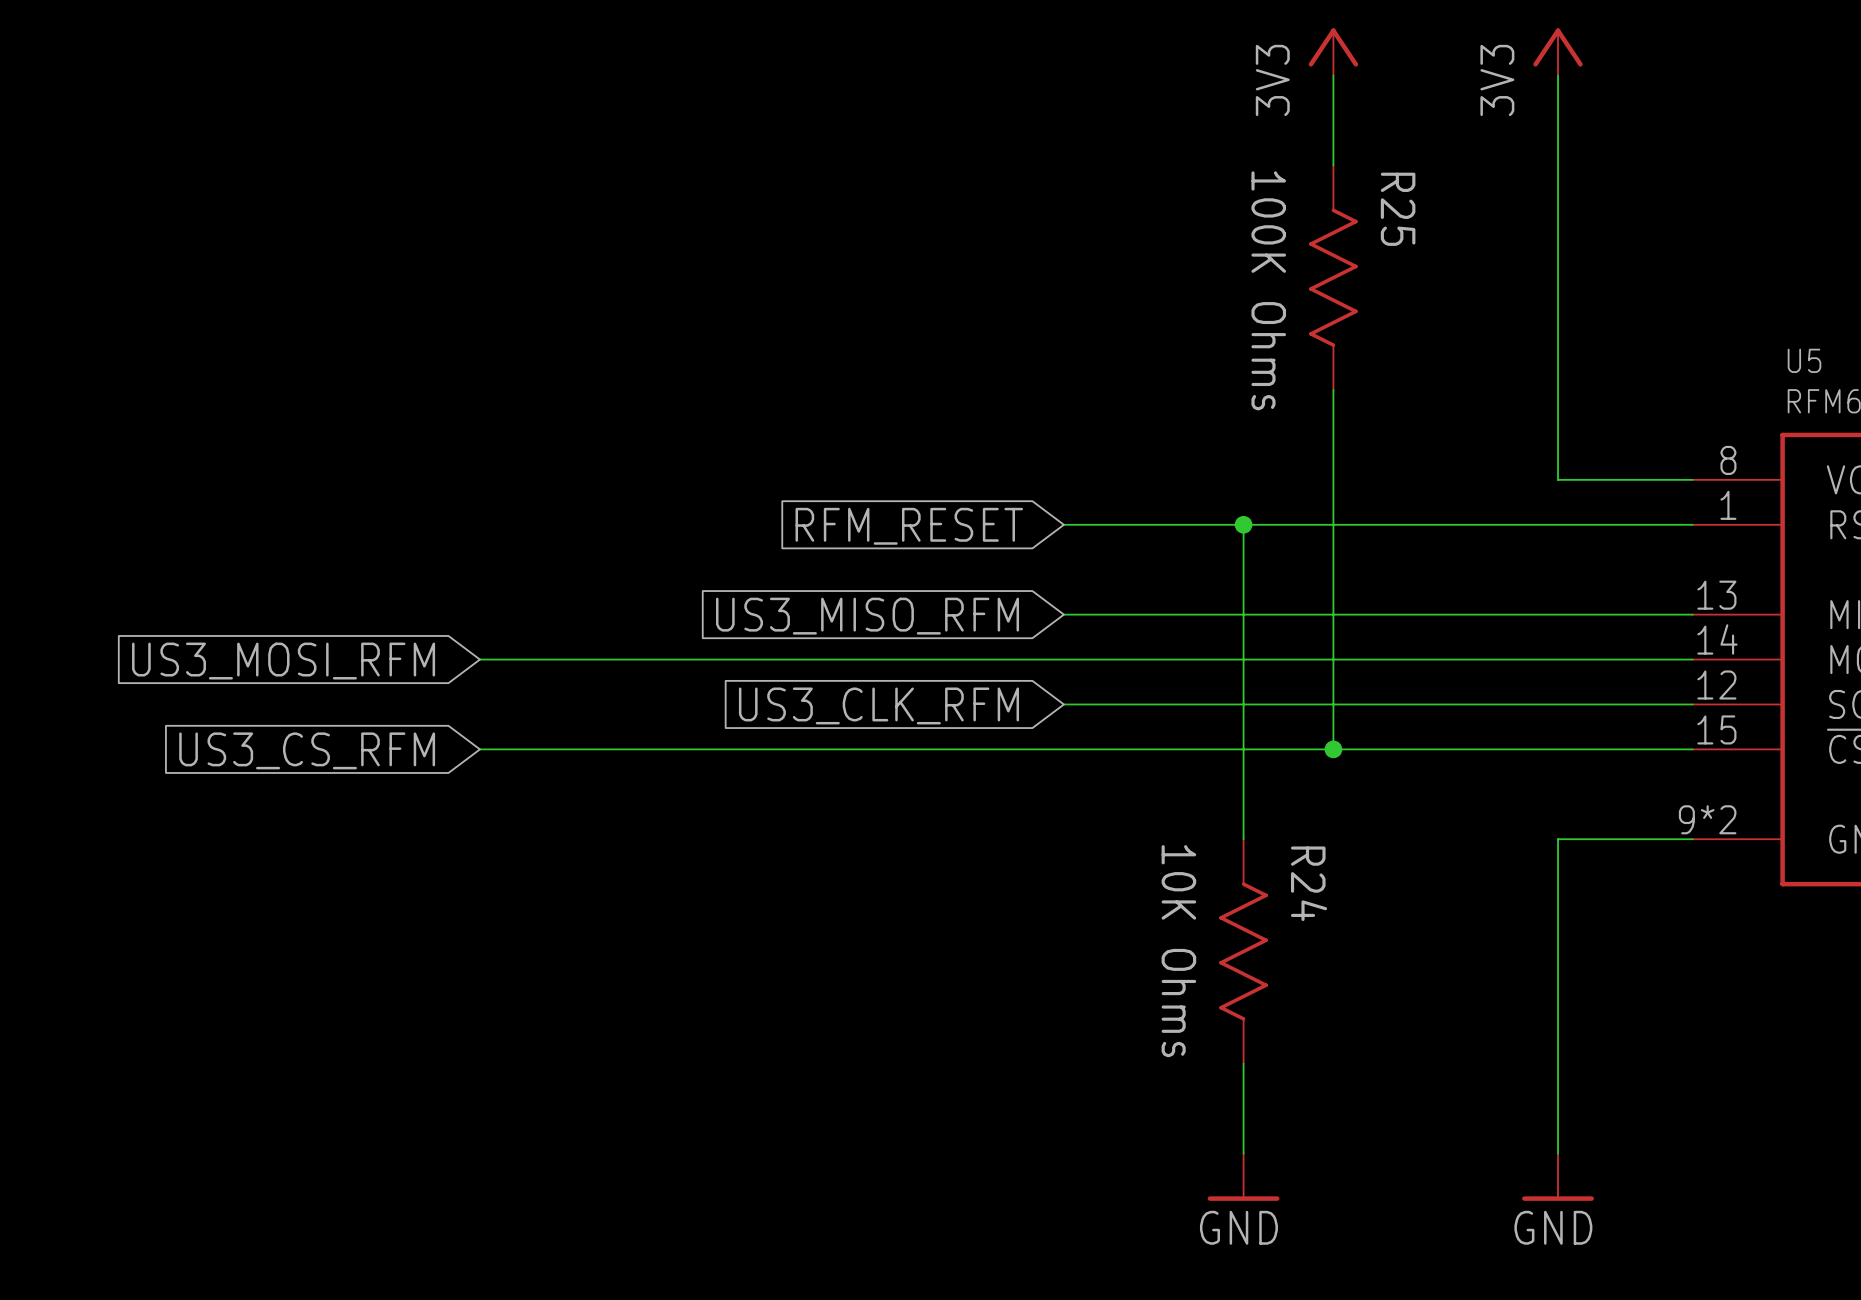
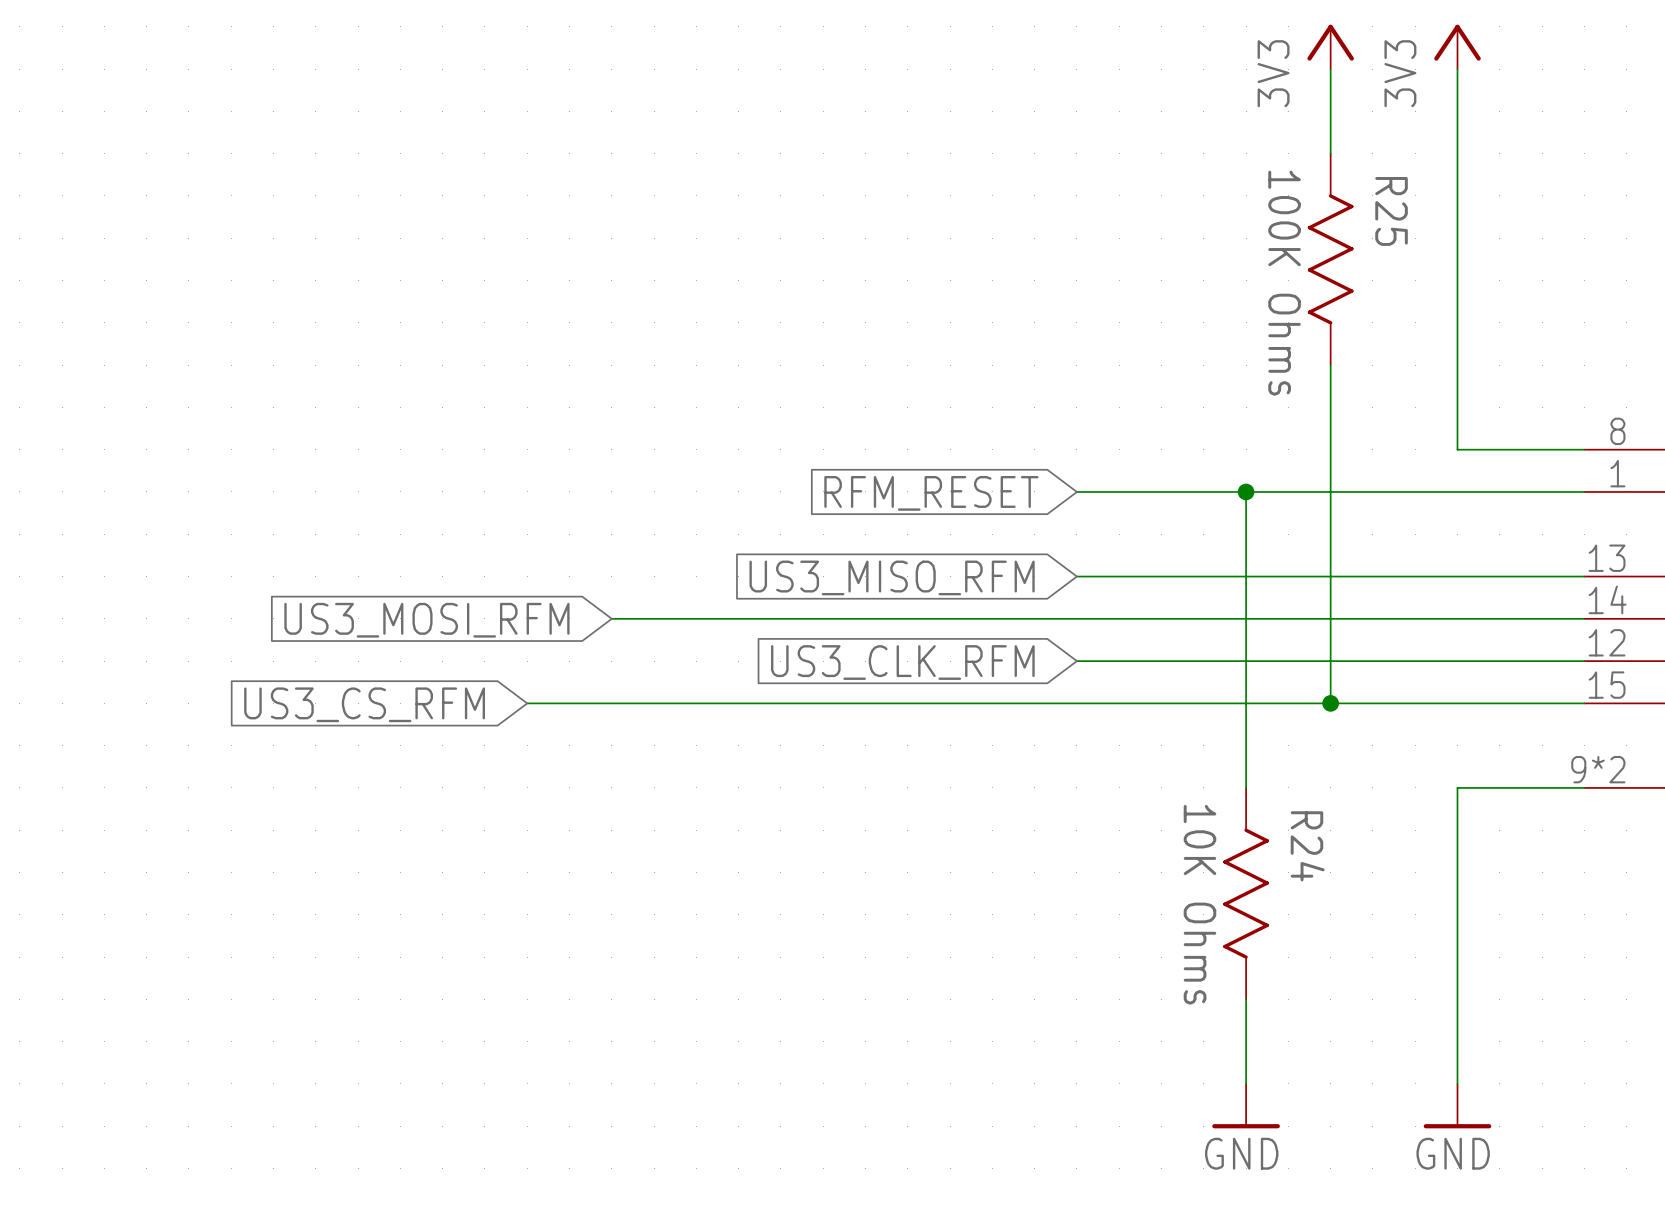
power symbol position: 3V3 (1333, 52) -> 3V3 (1330, 46)
wire: (1333, 75) (1333, 165) -> (1330, 69) (1330, 153)
R25 name position: R25 (1398, 209) -> R25 (1391, 211)
R25 position: (1333, 277) -> (1330, 259)
R25 value position: 100K Ohms (1268, 290) -> 100K Ohms (1284, 283)
wire: (1333, 390) (1333, 524) -> none
wire: none -> (1330, 365) (1330, 703)
wire: (1063, 524) (1153, 524) -> none
wire: (1243, 524) (1243, 839) -> none
junction position: (1243, 524) -> (1246, 491)
global label position: RFM_RESET (909, 526) -> RFM_RESET (931, 493)
wire: (1063, 614) (1153, 614) -> none
global label position: US3_MISO_RFM (867, 616) -> US3_MISO_RFM (892, 577)
wire: (479, 659) (659, 659) -> none
global label position: US3_MOSI_RFM (283, 661) -> US3_MOSI_RFM (426, 620)
wire: (1063, 704) (1153, 704) -> none
global label position: US3_CLK_RFM (878, 705) -> US3_CLK_RFM (902, 662)
wire: (479, 749) (569, 749) -> none
wire: none -> (1246, 703) (1246, 787)
junction position: (1333, 749) -> (1330, 703)
global label position: US3_CS_RFM (307, 750) -> US3_CS_RFM (364, 704)
R24 name position: R24 (1309, 883) -> R24 (1307, 846)
R24 value position: 10K Ohms (1178, 951) -> 10K Ohms (1199, 904)
R24 position: (1243, 951) -> (1246, 893)
wire: (1243, 1063) (1243, 1153) -> (1246, 999) (1246, 1083)
power symbol position: GND (1243, 1177) -> GND (1246, 1106)

